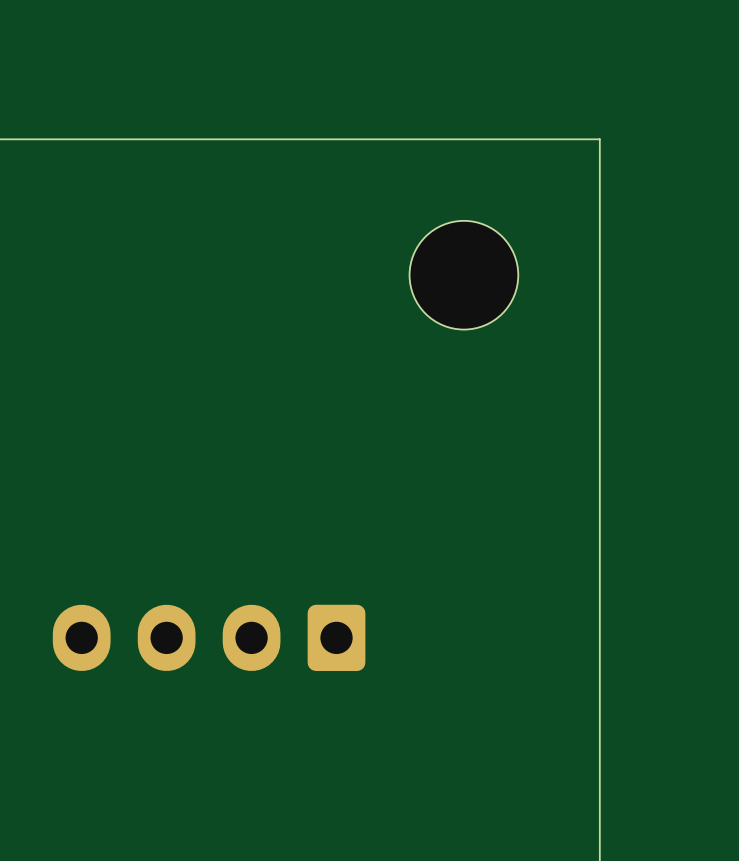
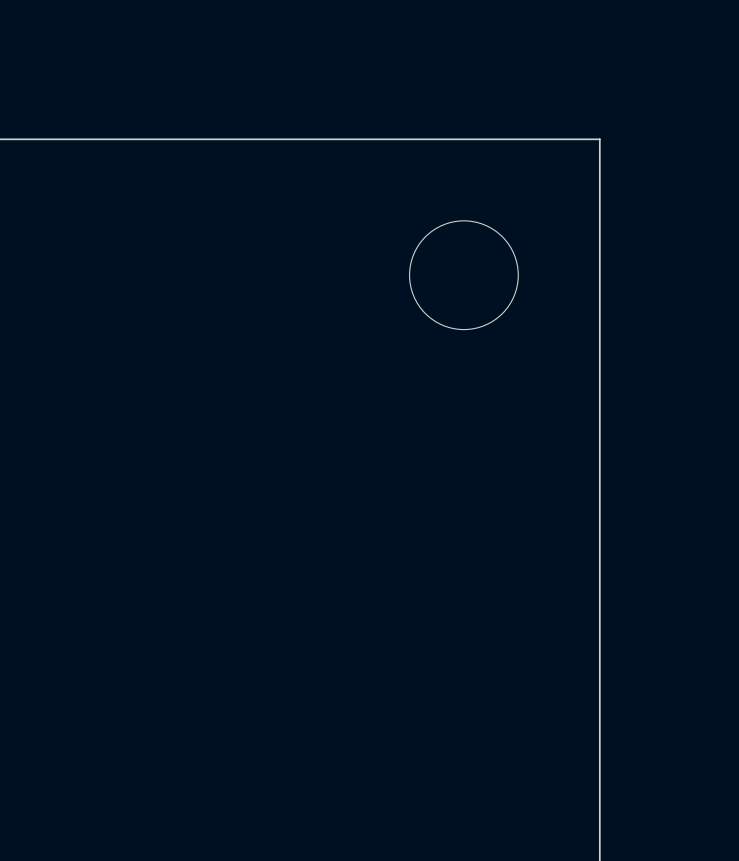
part: (209, 637) -> none

